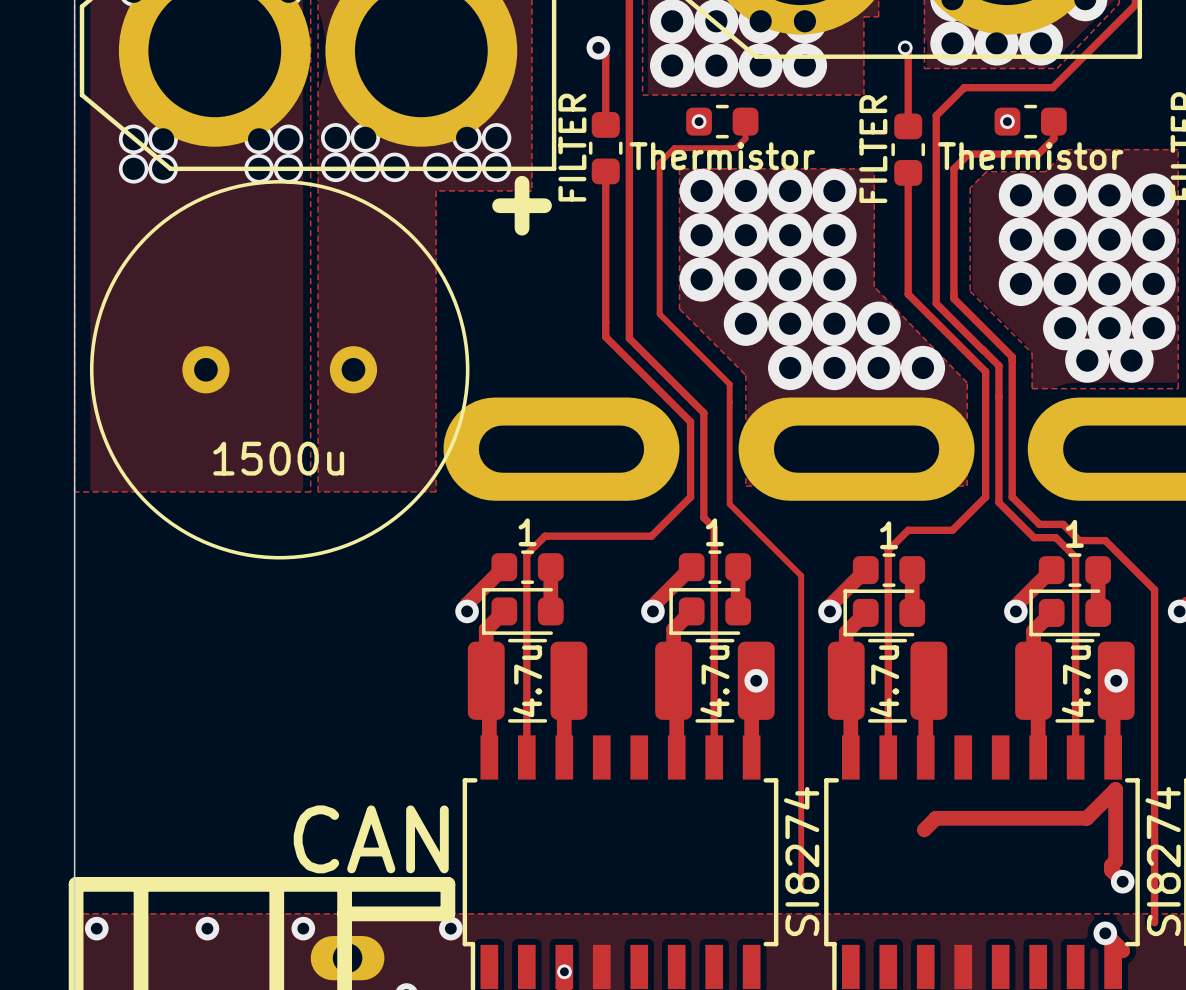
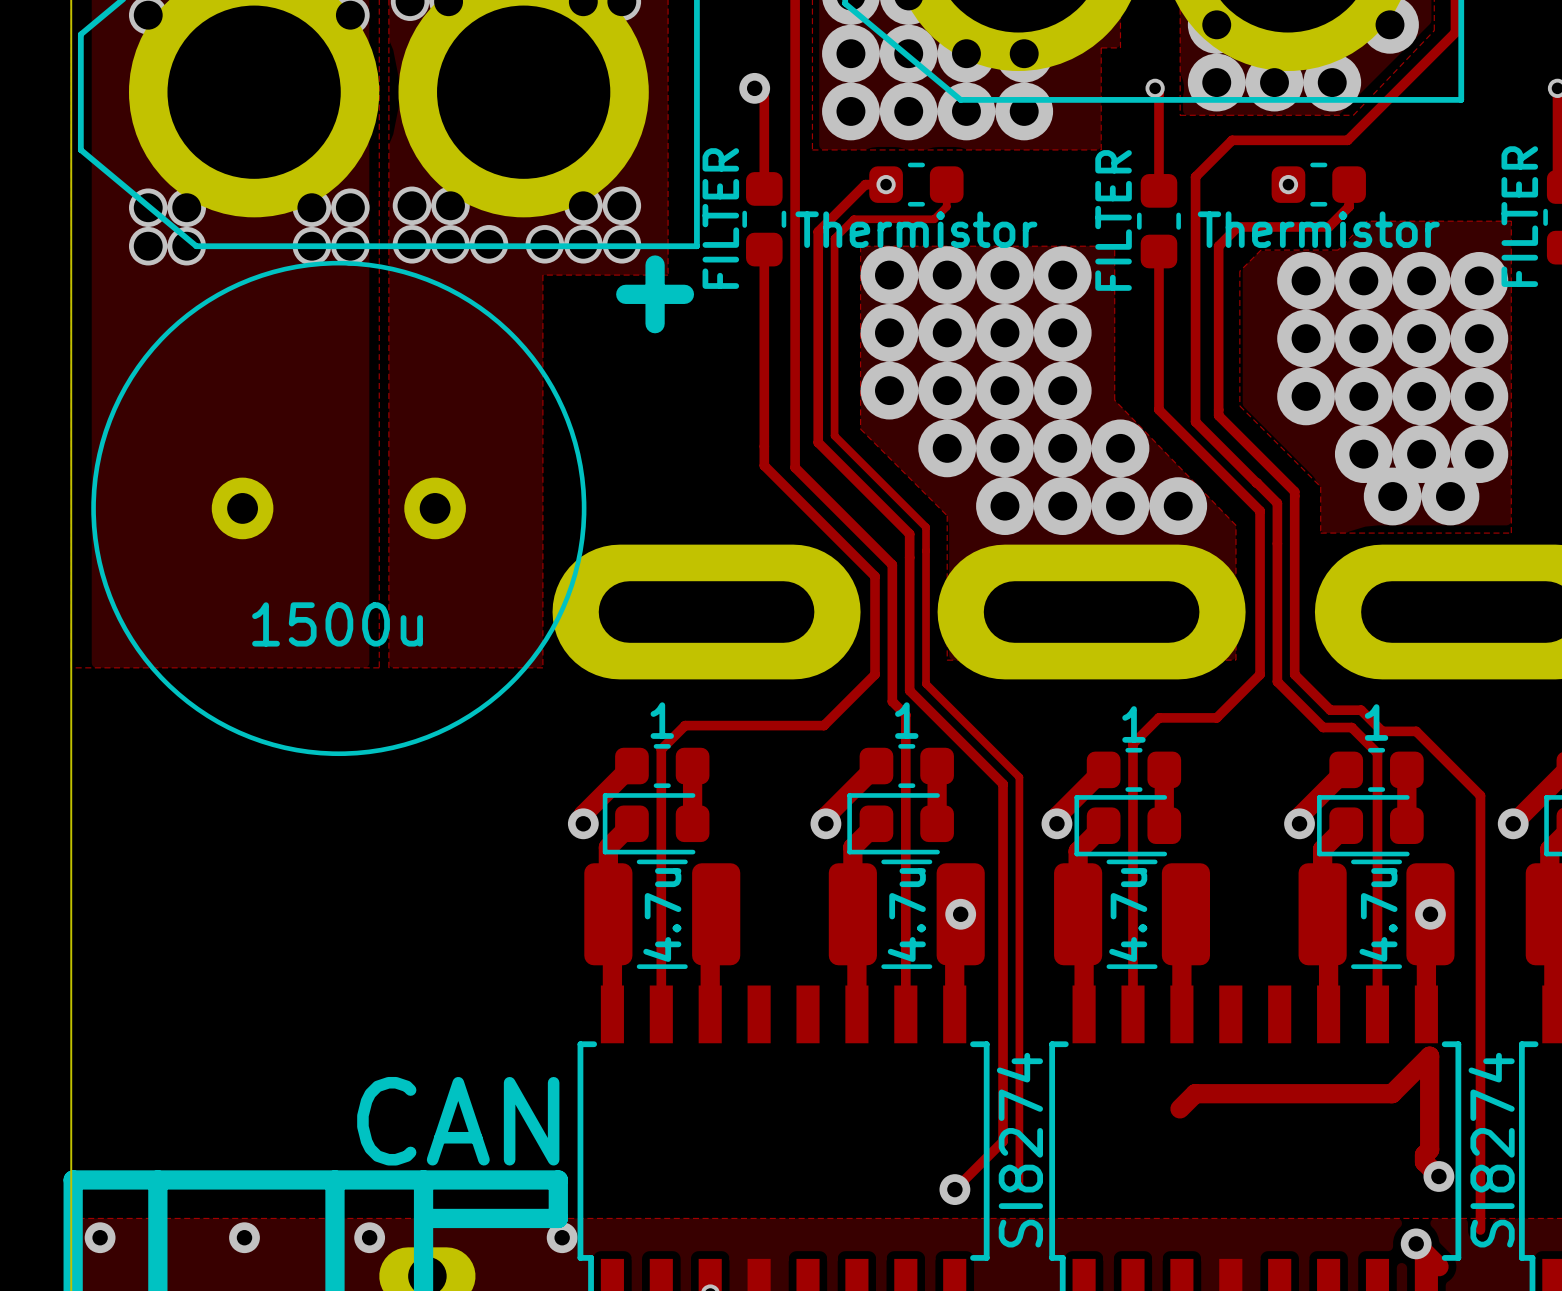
track: none -> (886, 184) (865, 184) (818, 231) (818, 442) (909, 534) (909, 690) (1003, 784) (1003, 1141) (954, 1189)
via: none -> (954, 1189)

